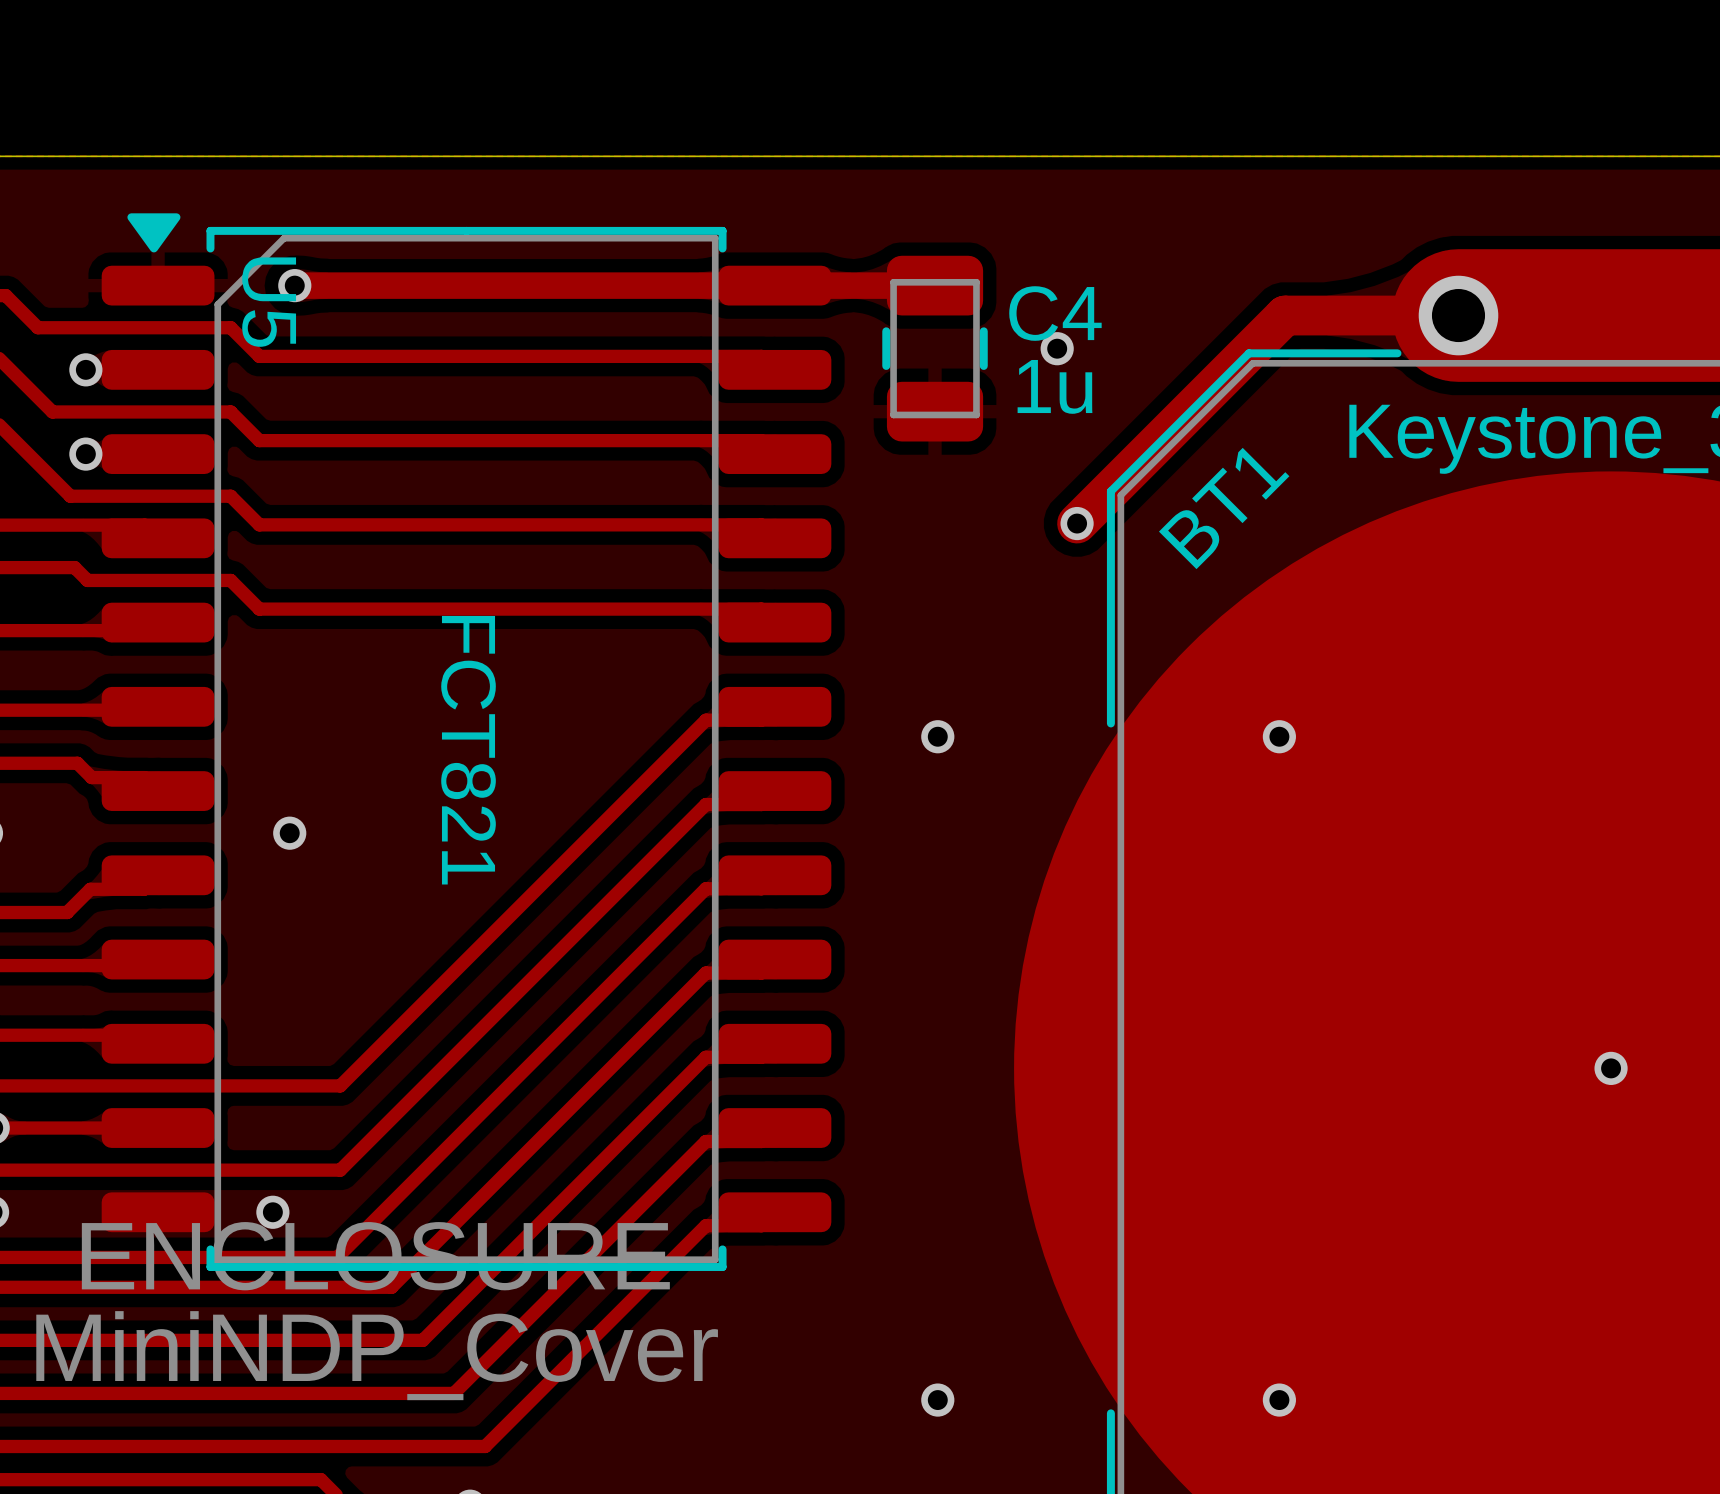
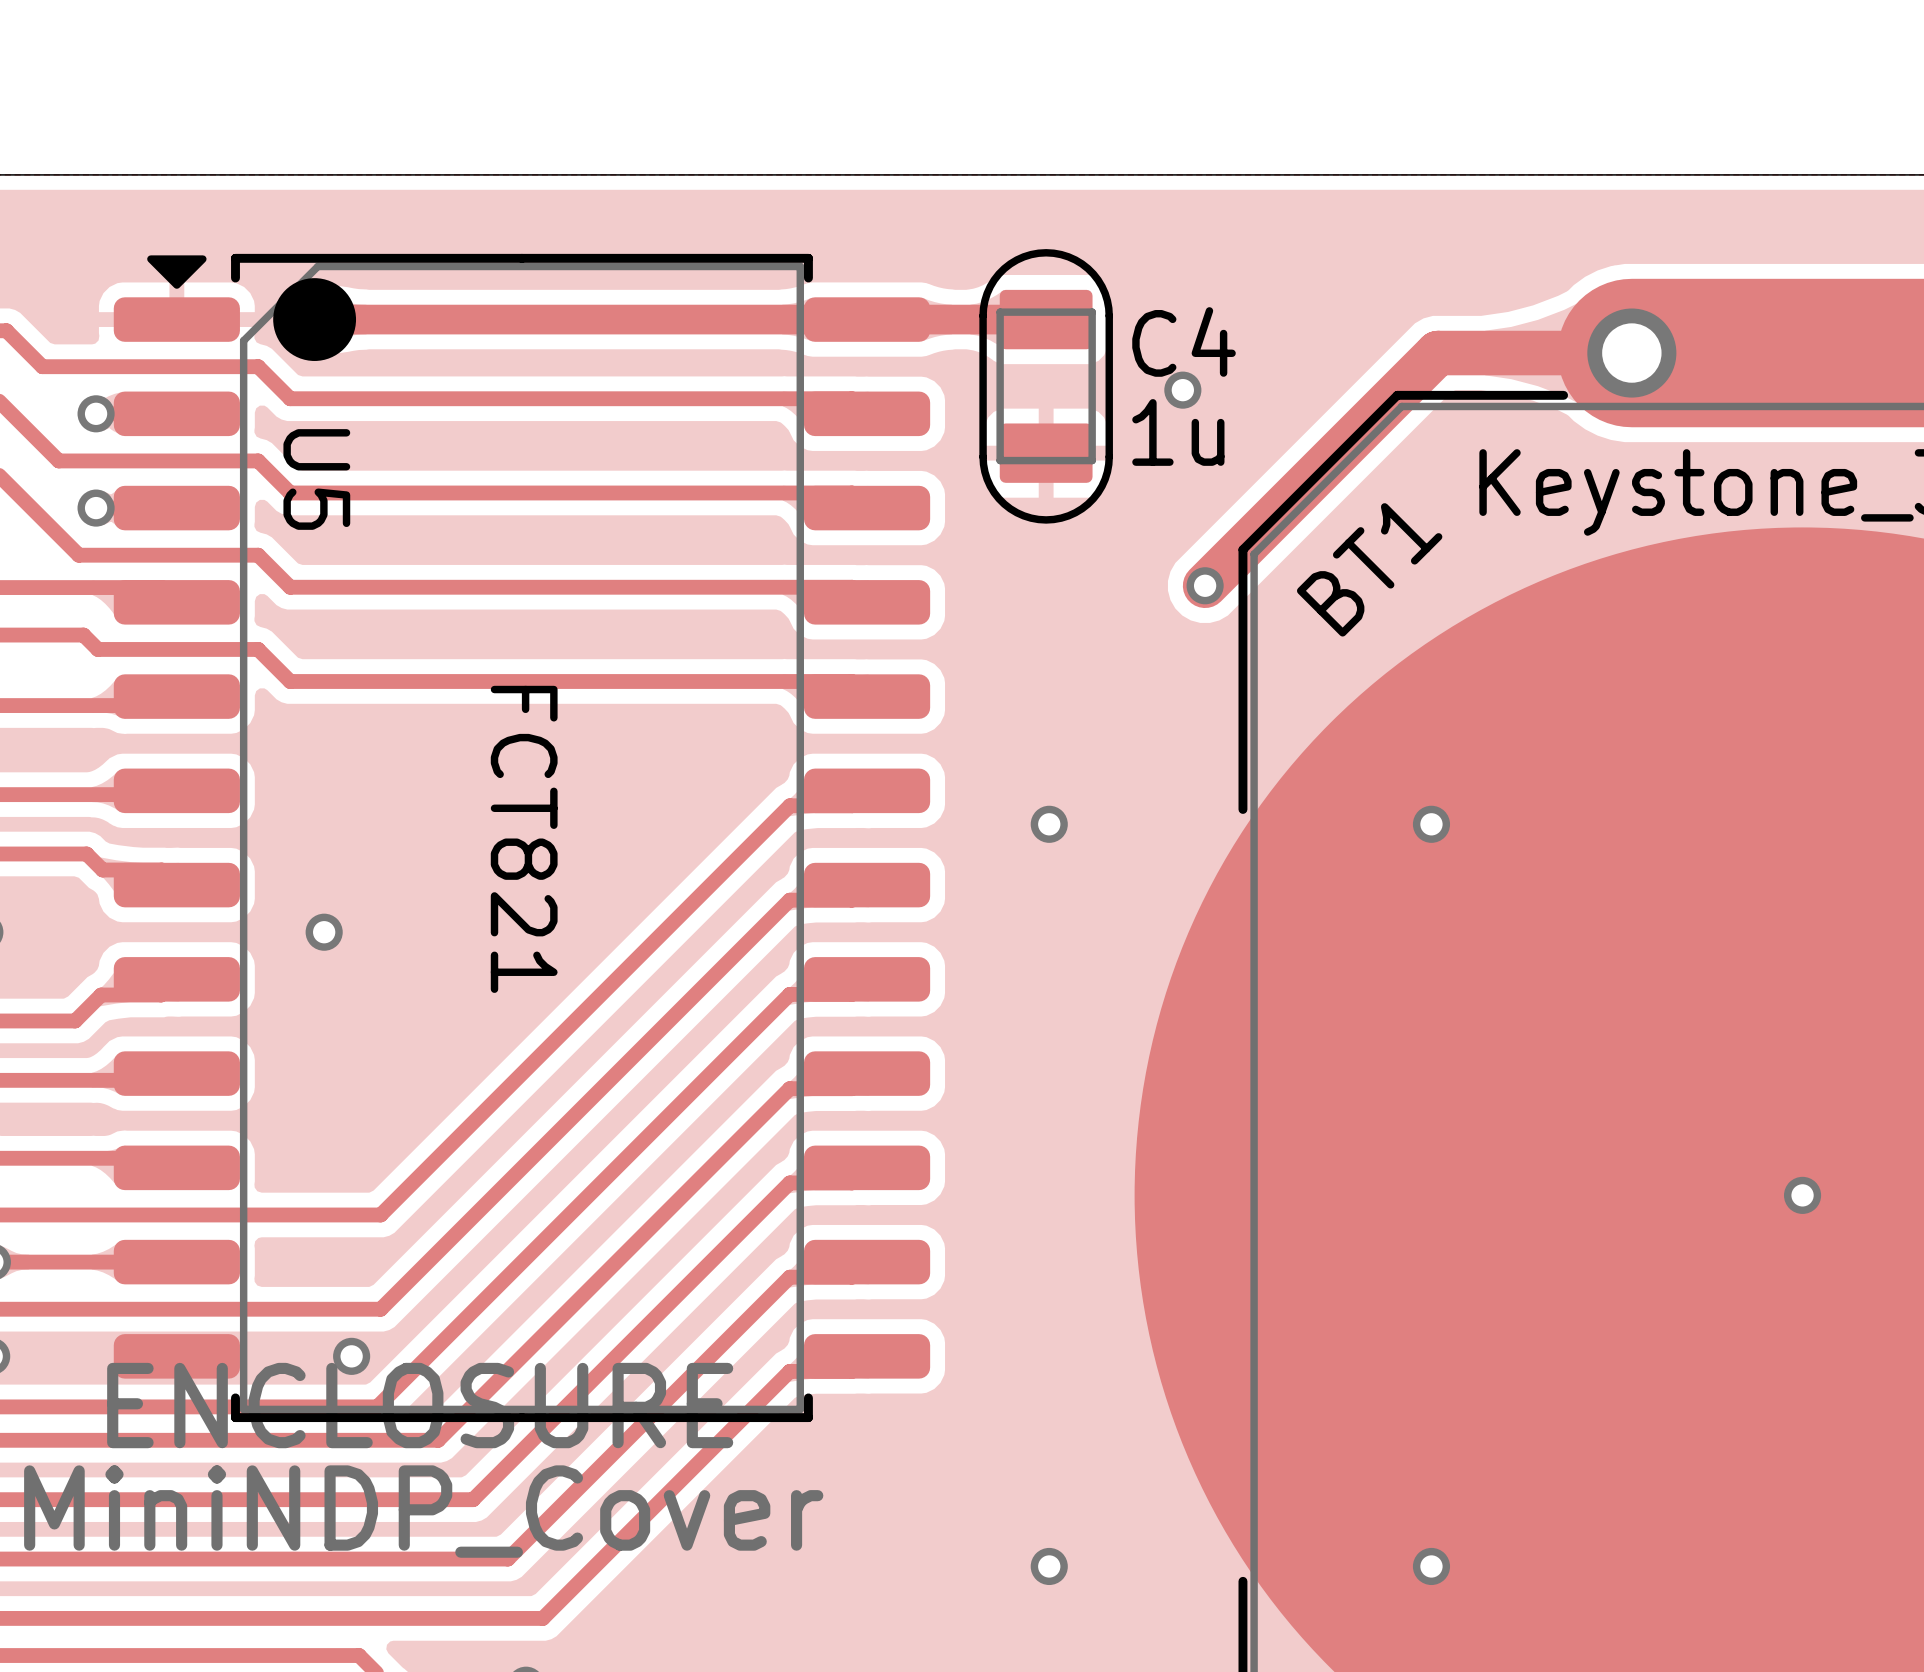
U5 footprint: [101, 213, 832, 1271] -> [113, 253, 931, 1423]
C4 footprint: [882, 255, 988, 442] -> [979, 249, 1113, 524]
via position: (272, 1212) -> (351, 1356)

